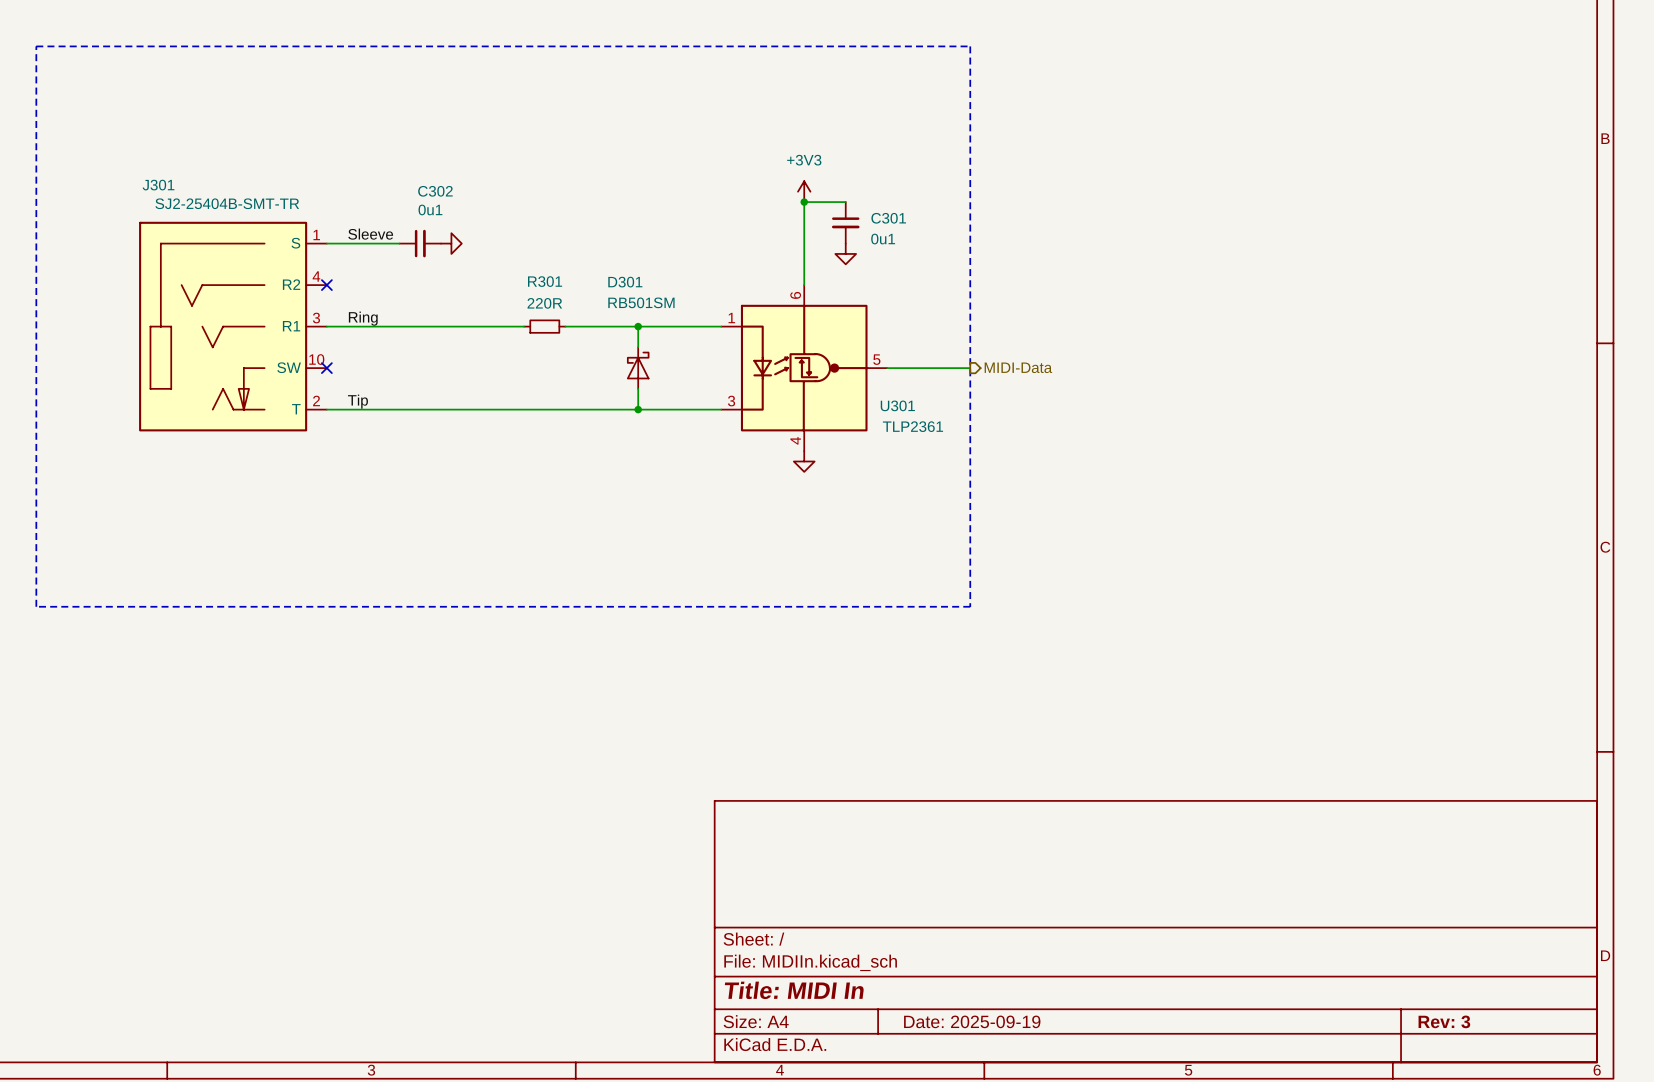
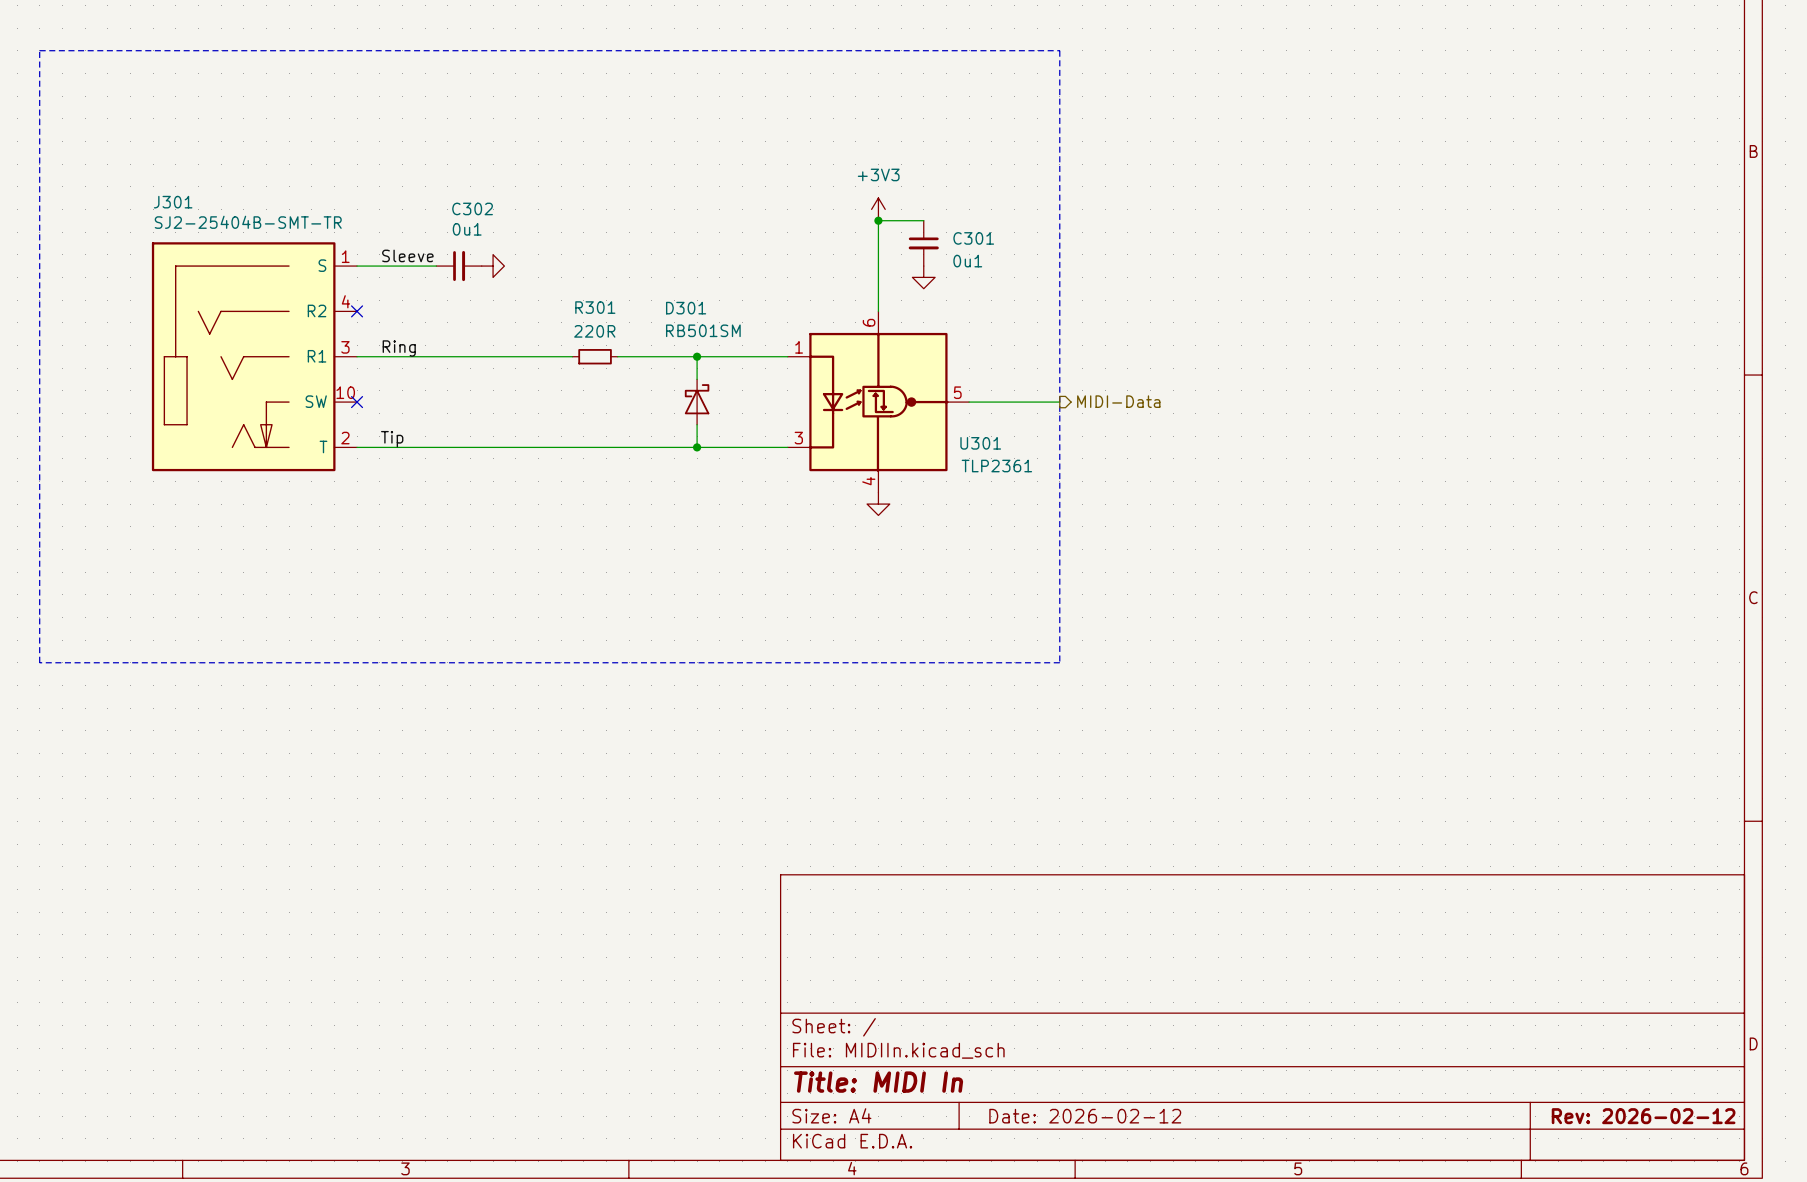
title block: Date: 2025-09-19 (972, 1021) -> Date: 2026-02-12 (1085, 1116)
title block: Rev: 3 (1444, 1021) -> Rev: 2026-02-12 (1643, 1116)

